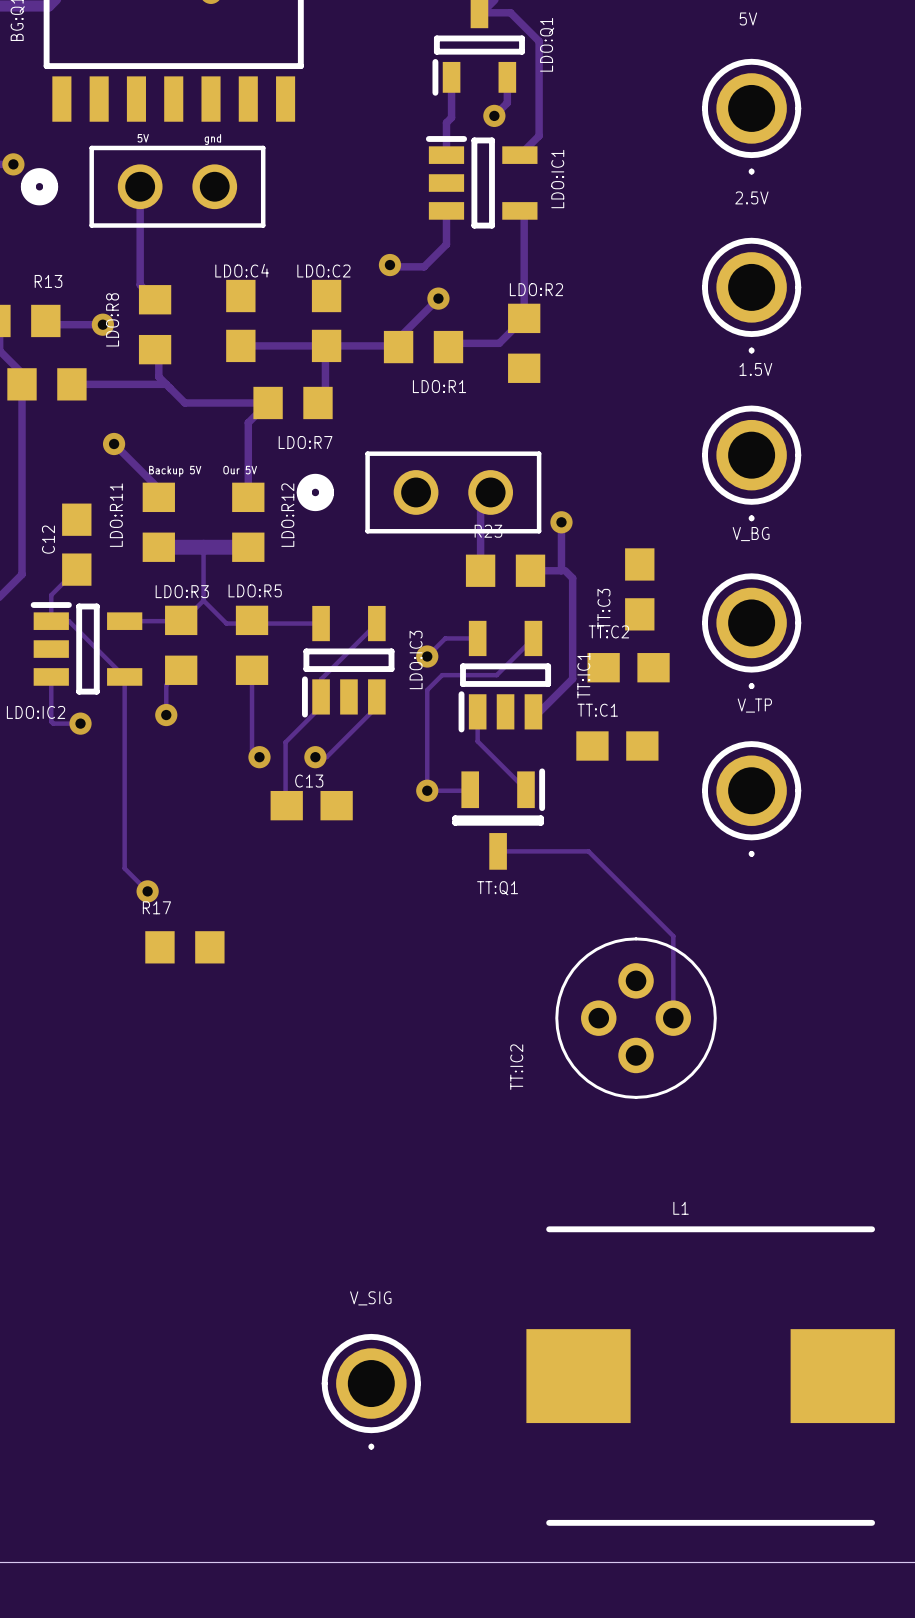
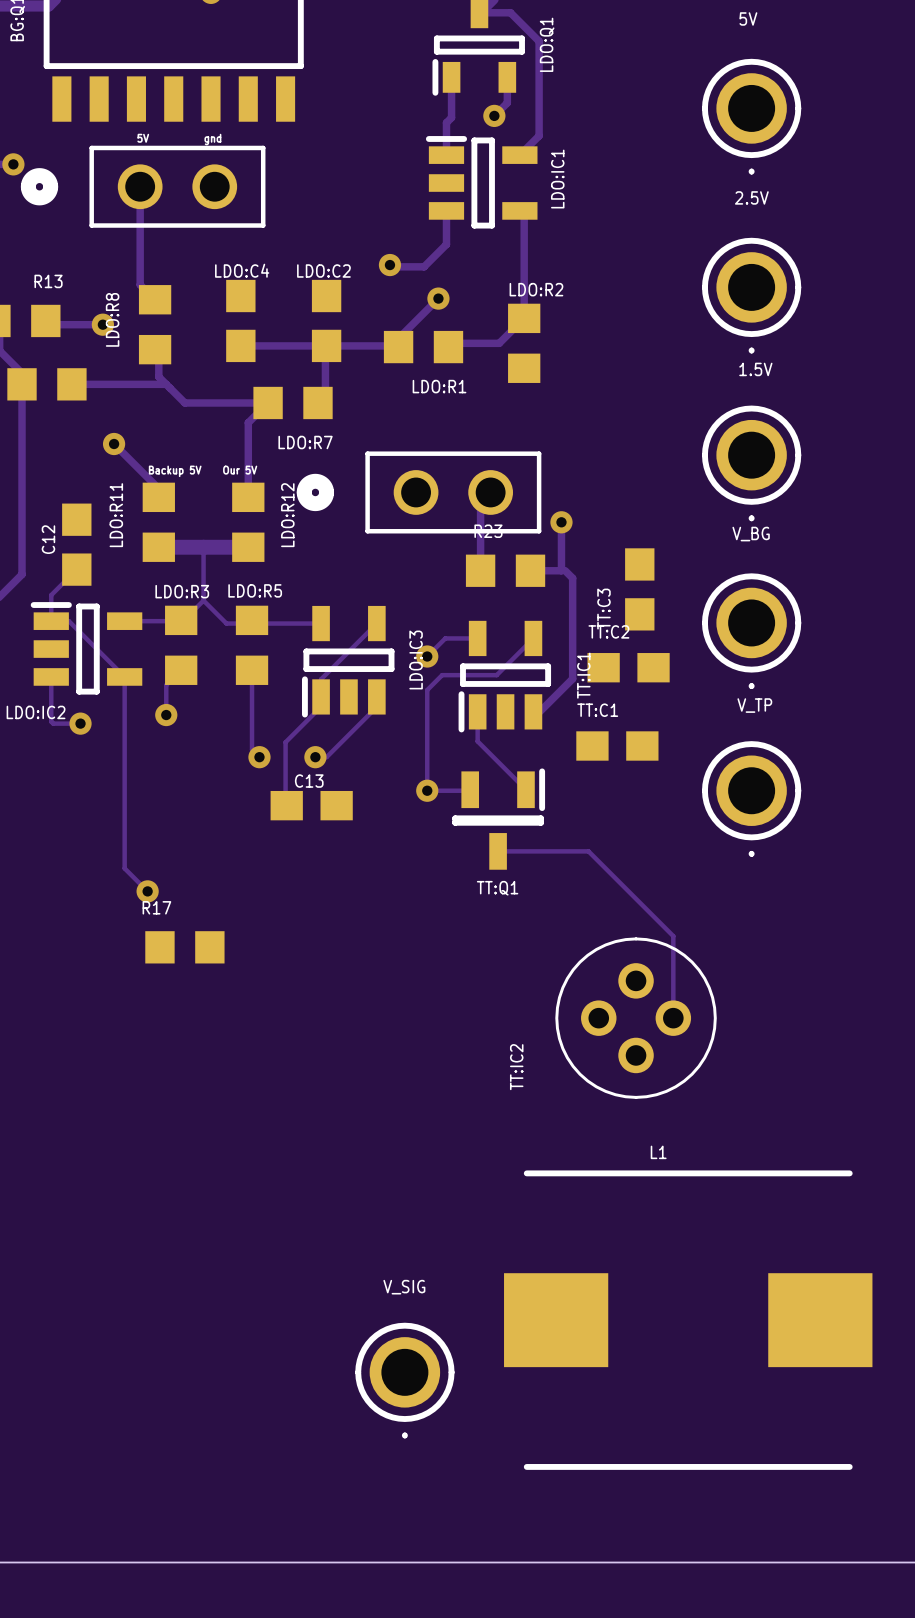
L1 position: (710, 1376) -> (688, 1320)
V_SIG position: (371, 1391) -> (404, 1380)

